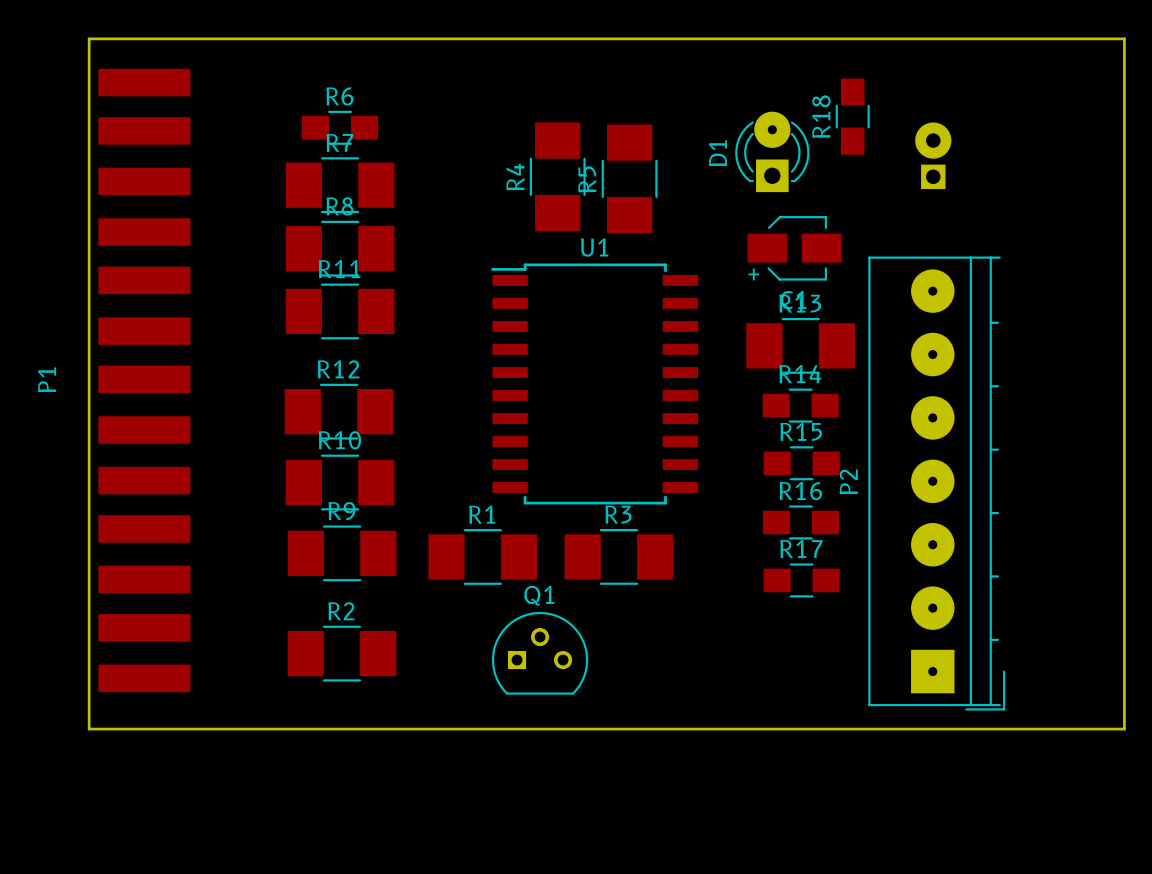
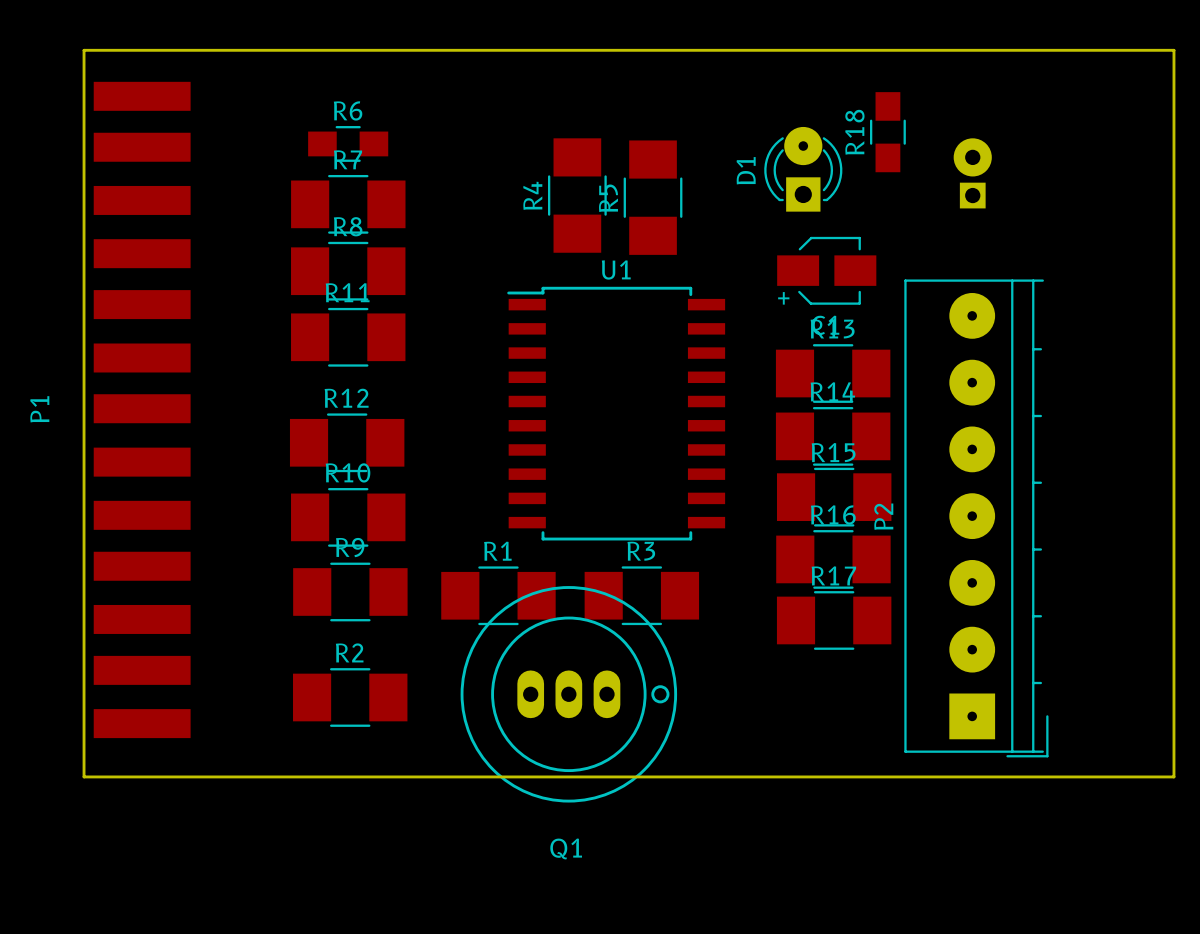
R14 footprint: [762, 388, 839, 423] -> [775, 407, 891, 466]
R15 footprint: [763, 446, 840, 481] -> [776, 467, 892, 527]
R16 footprint: [762, 505, 839, 540] -> [776, 530, 891, 589]
R17 footprint: [763, 563, 840, 598] -> [776, 591, 892, 650]
Q1 name position: Q1 (539, 595) -> Q1 (566, 848)
Q1 footprint: [491, 611, 589, 695] -> [460, 586, 678, 803]

